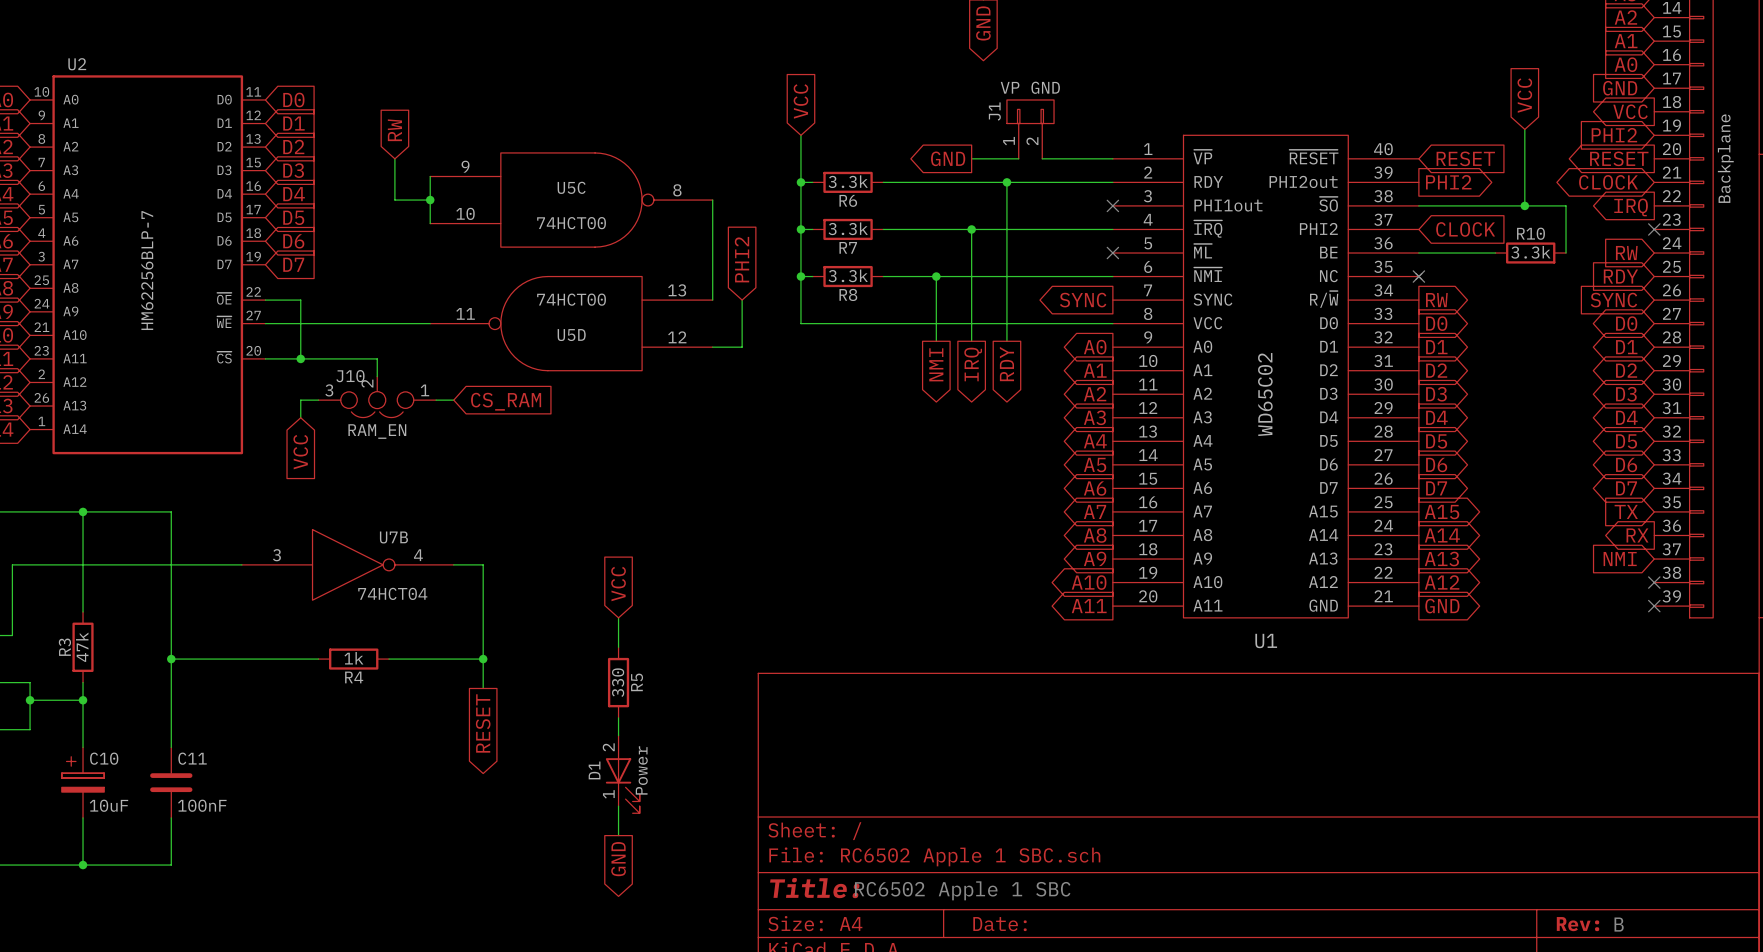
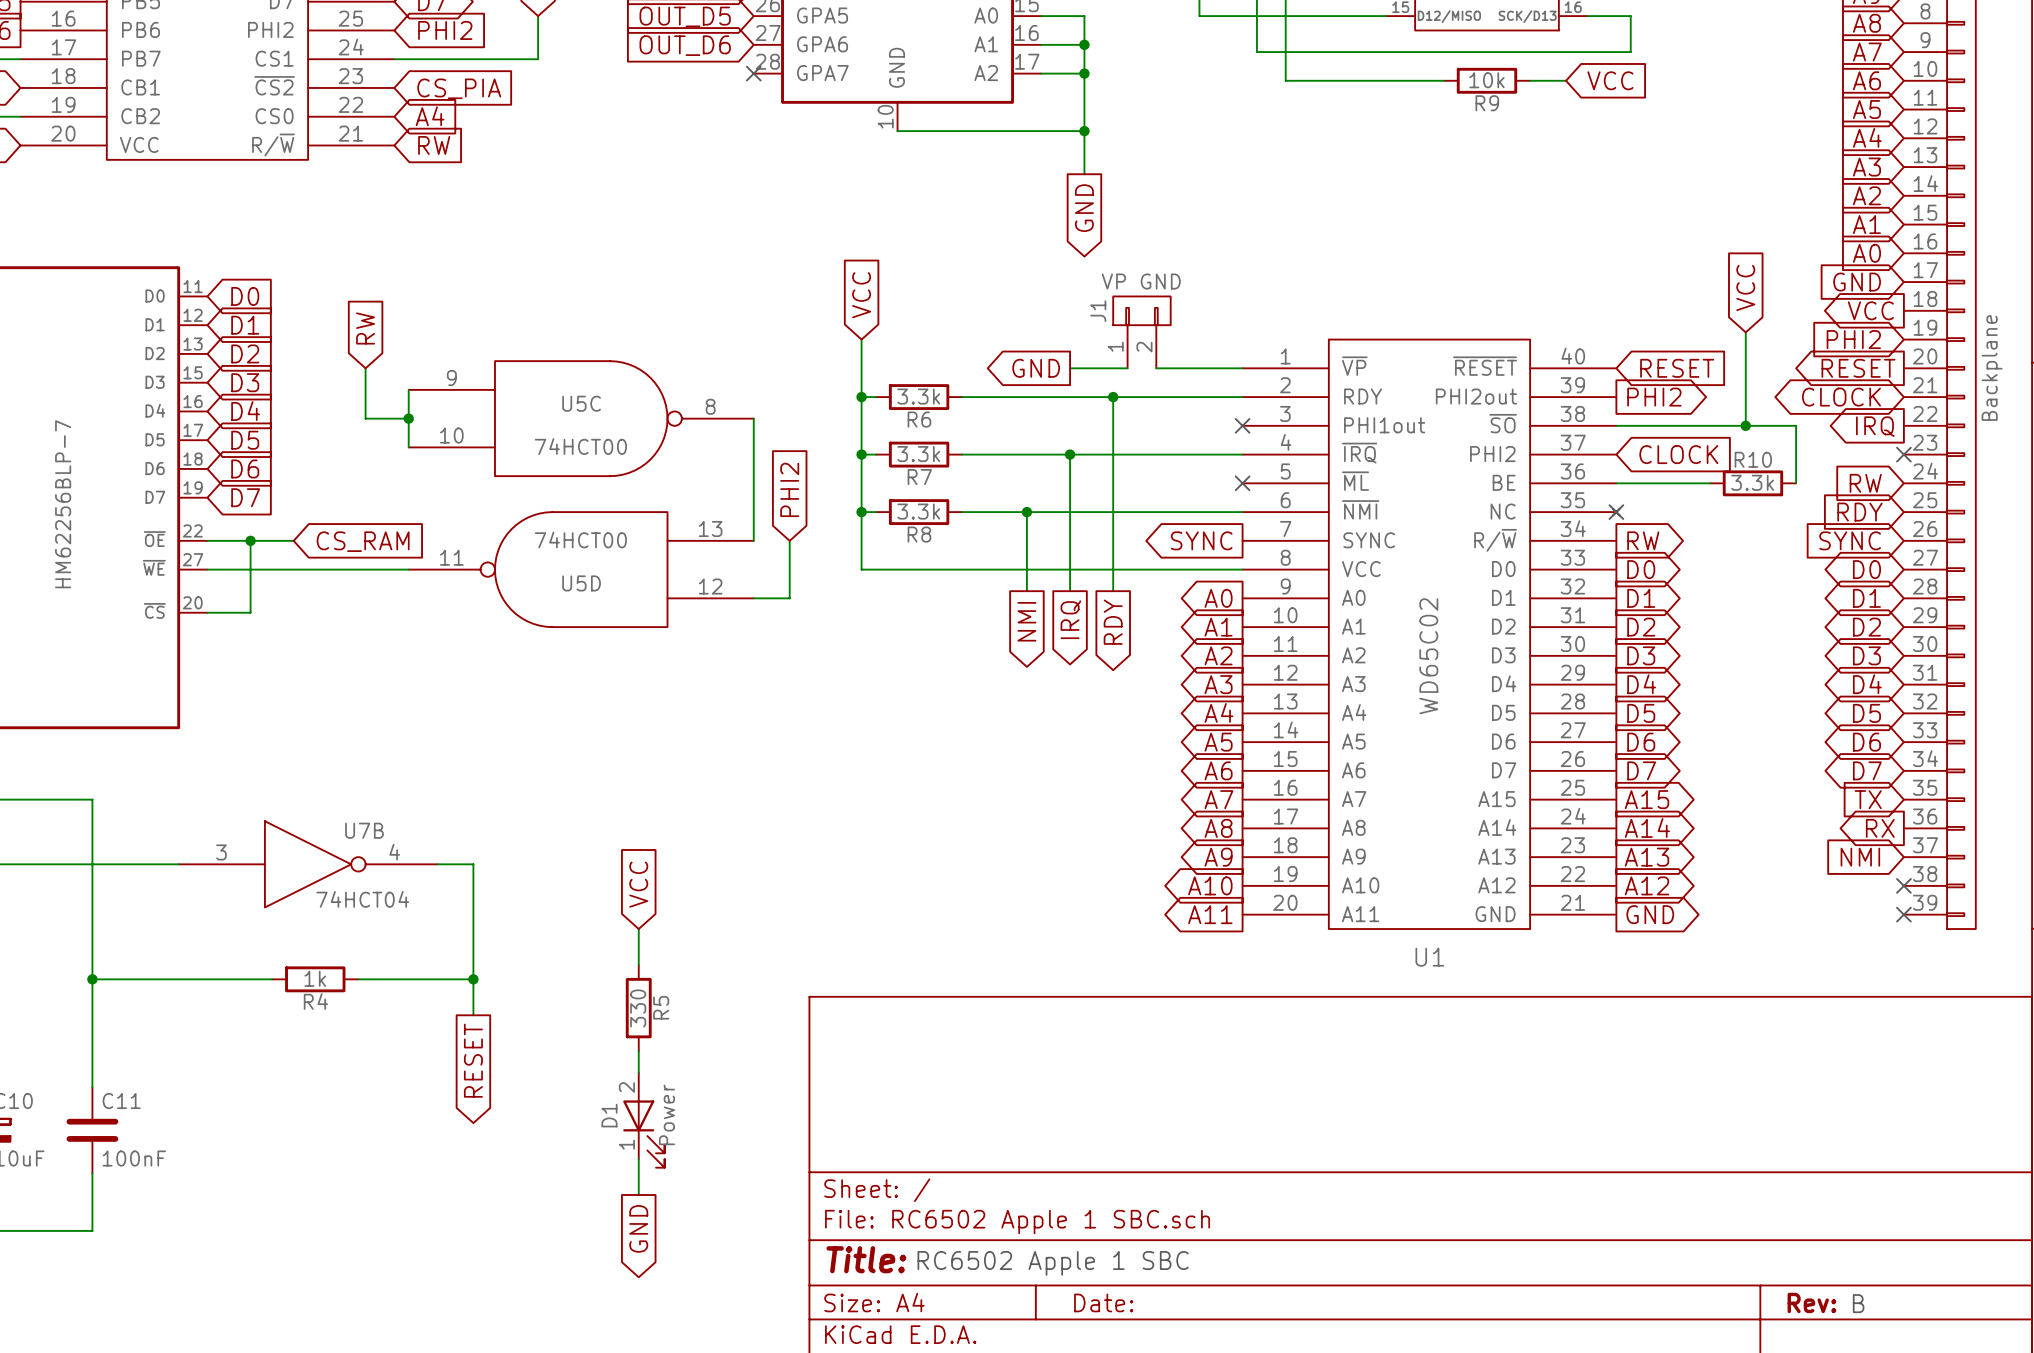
wire: none -> (250, 540) (293, 540)
junction: none -> (250, 540)
wire: (300, 358) (377, 358) (377, 376) -> none
junction: (300, 358) -> none
J10: RAM_EN (377, 397) -> none
wire: (318, 400) (300, 400) (300, 417) -> none
wire: (436, 400) (453, 400) -> none
global label position: CS_RAM (506, 401) -> CS_RAM (363, 541)
global label: VCC (300, 452) -> none

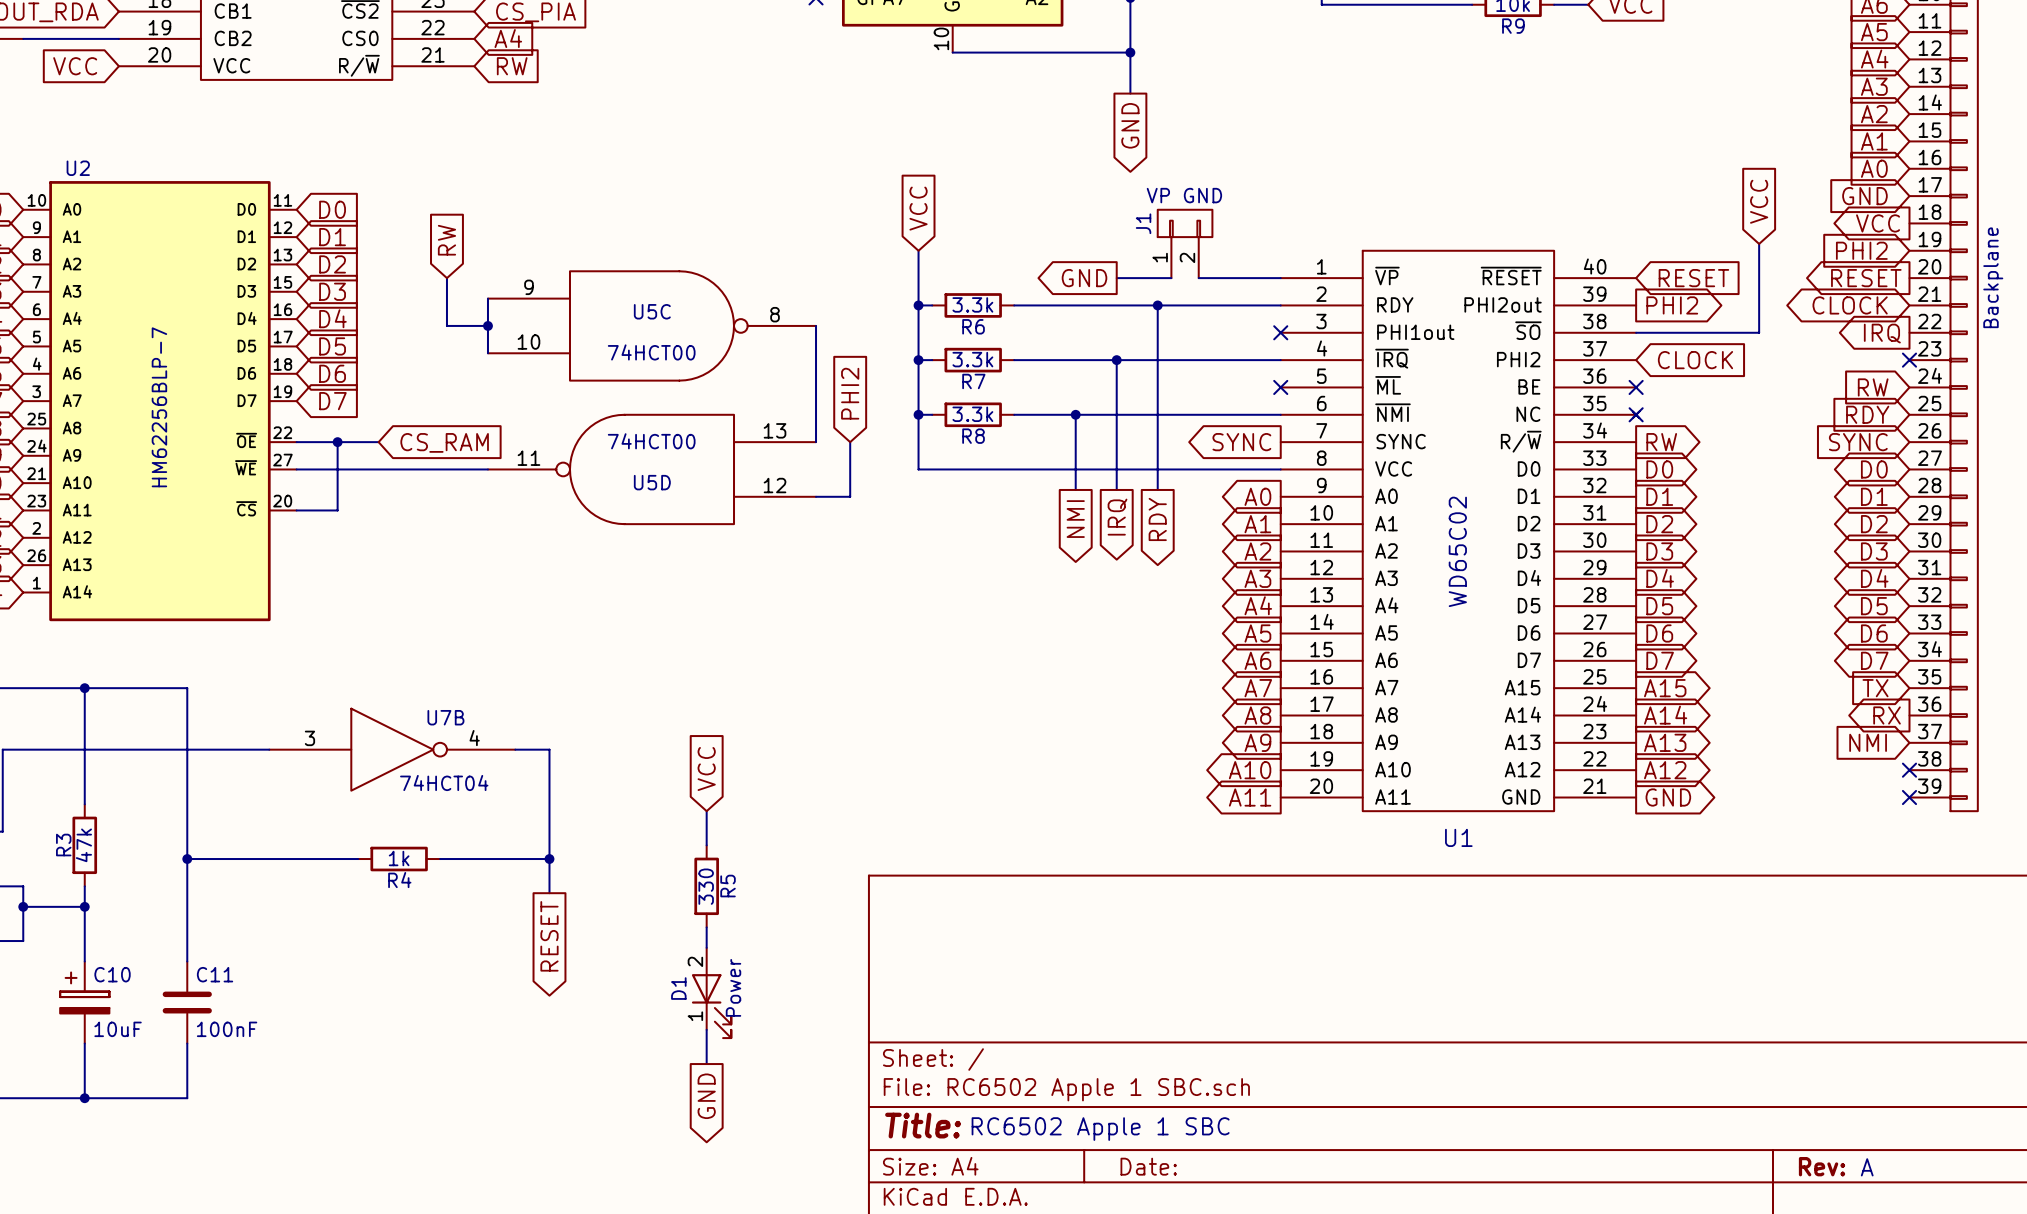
wire: (1745, 425) (1796, 425) (1796, 483) -> none
junction: (1745, 425) -> none
wire: (1616, 483) (1709, 483) -> none
no-connect mark: none -> (1636, 387)
R10: 3.3k (1752, 483) -> none
text: B (1858, 1303) -> A (1867, 1167)

